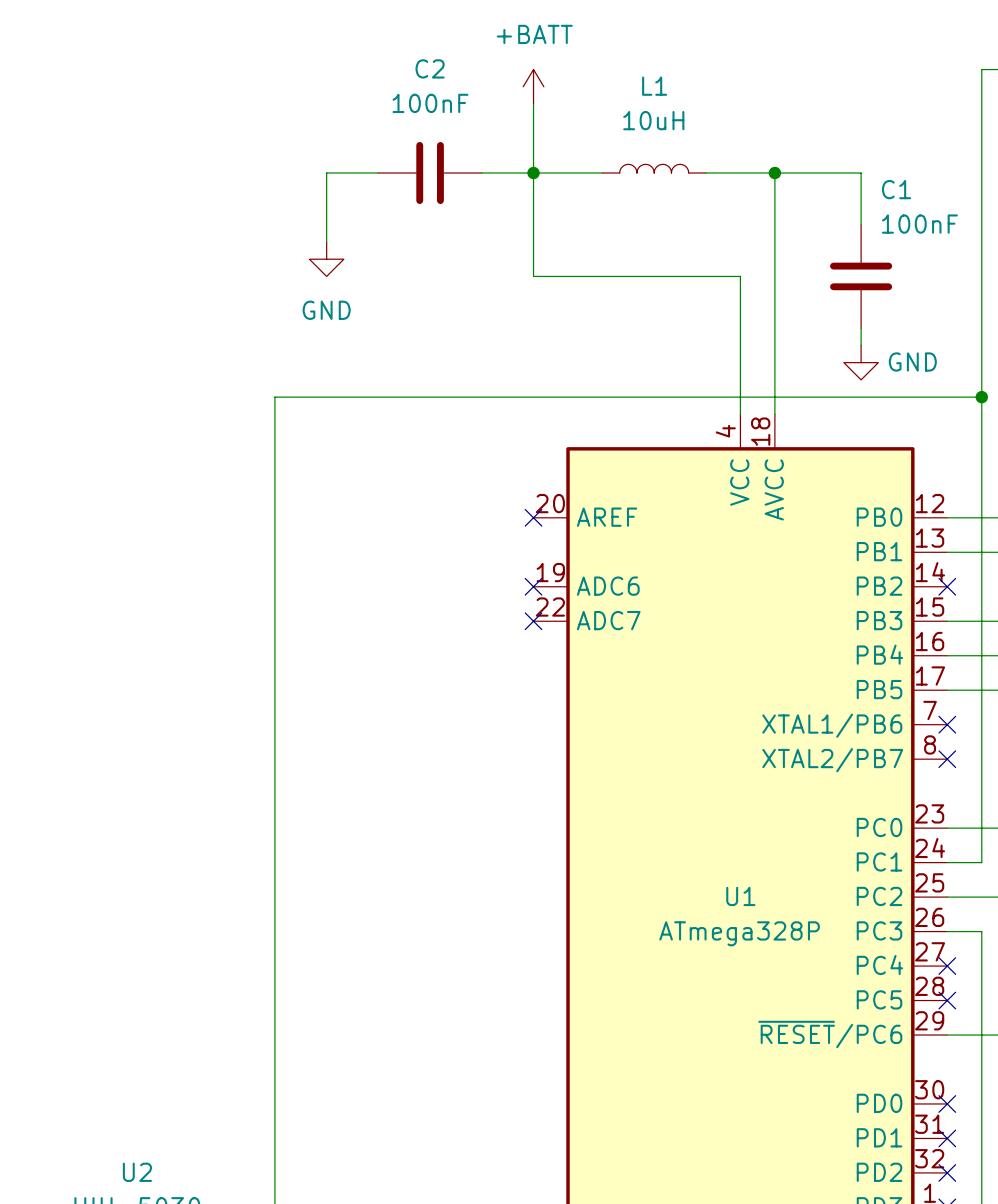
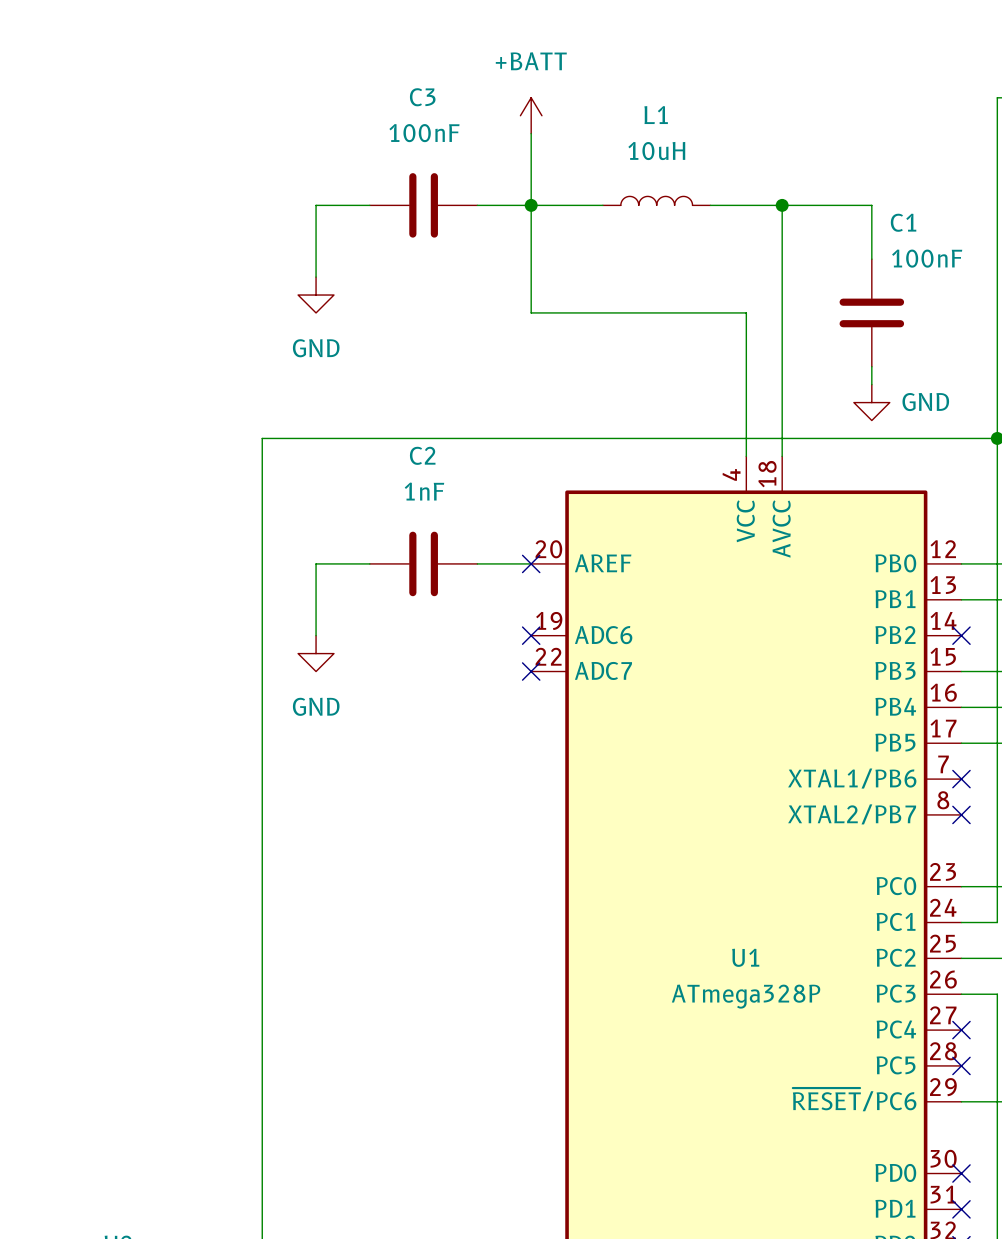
C2 name: C2 (430, 68) -> C3 (422, 97)
wire: none -> (369, 563) (316, 563) (316, 635)
C2: none -> 1nF (423, 563)
wire: none -> (477, 563) (531, 563)
power symbol: none -> GND (316, 653)

